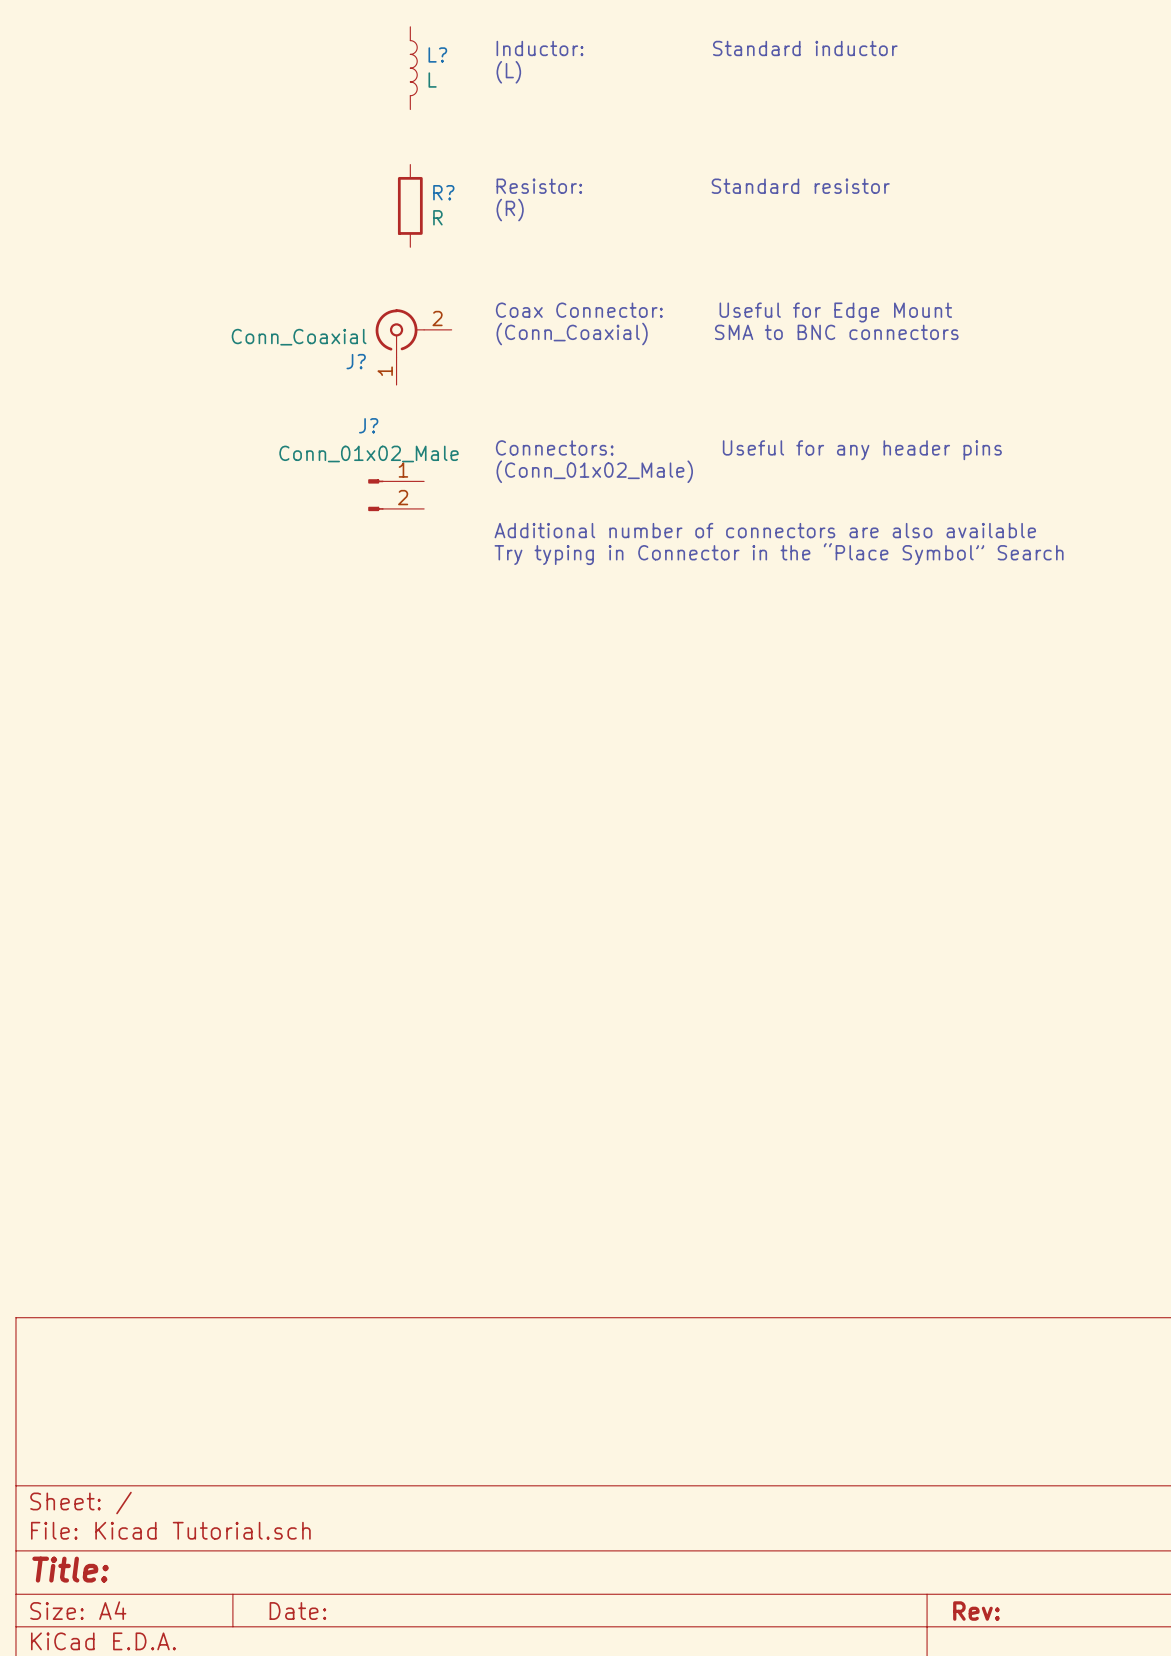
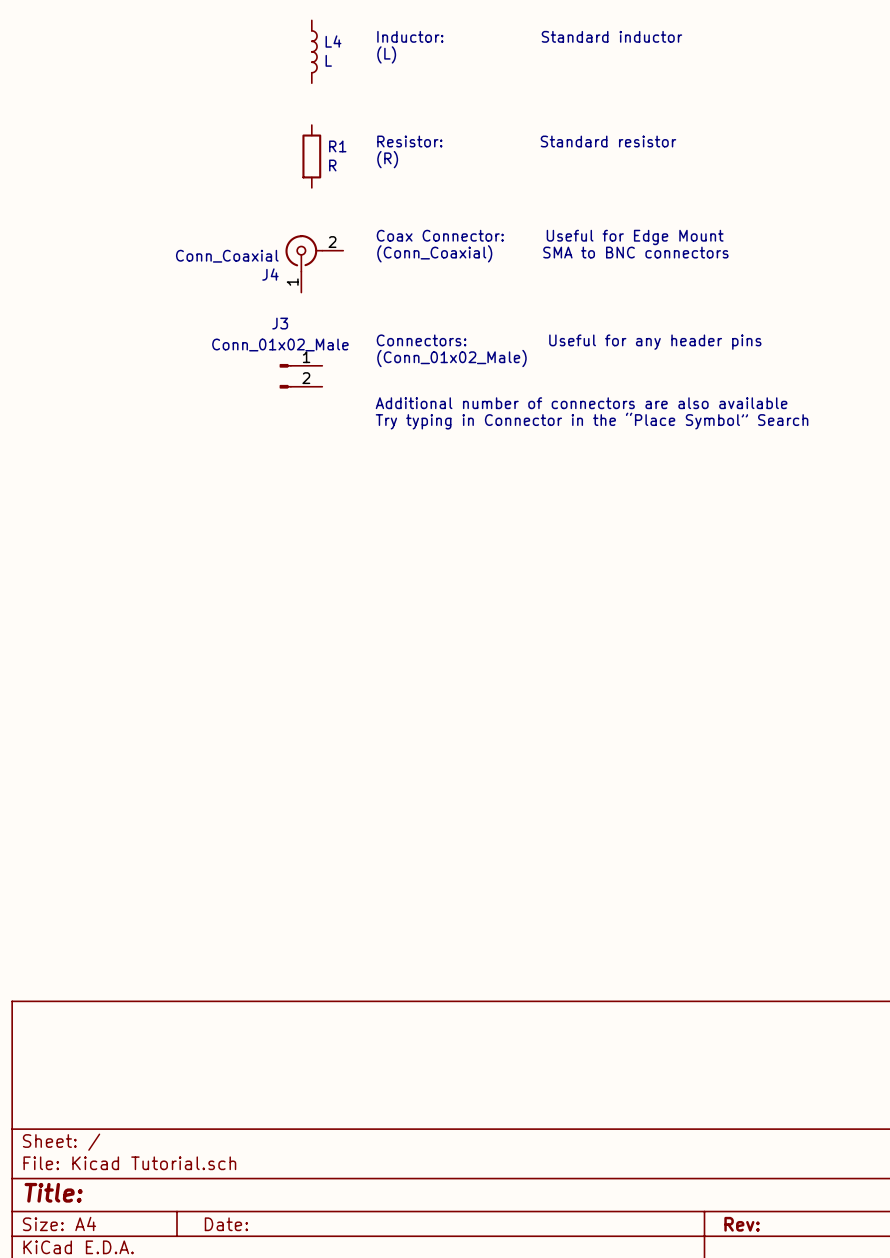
L? name: L? (437, 54) -> L4 (333, 41)
R? name: R? (443, 192) -> R1 (337, 146)
J? name: J? (356, 361) -> J4 (270, 274)
J? name: J? (368, 425) -> J3 (280, 323)

